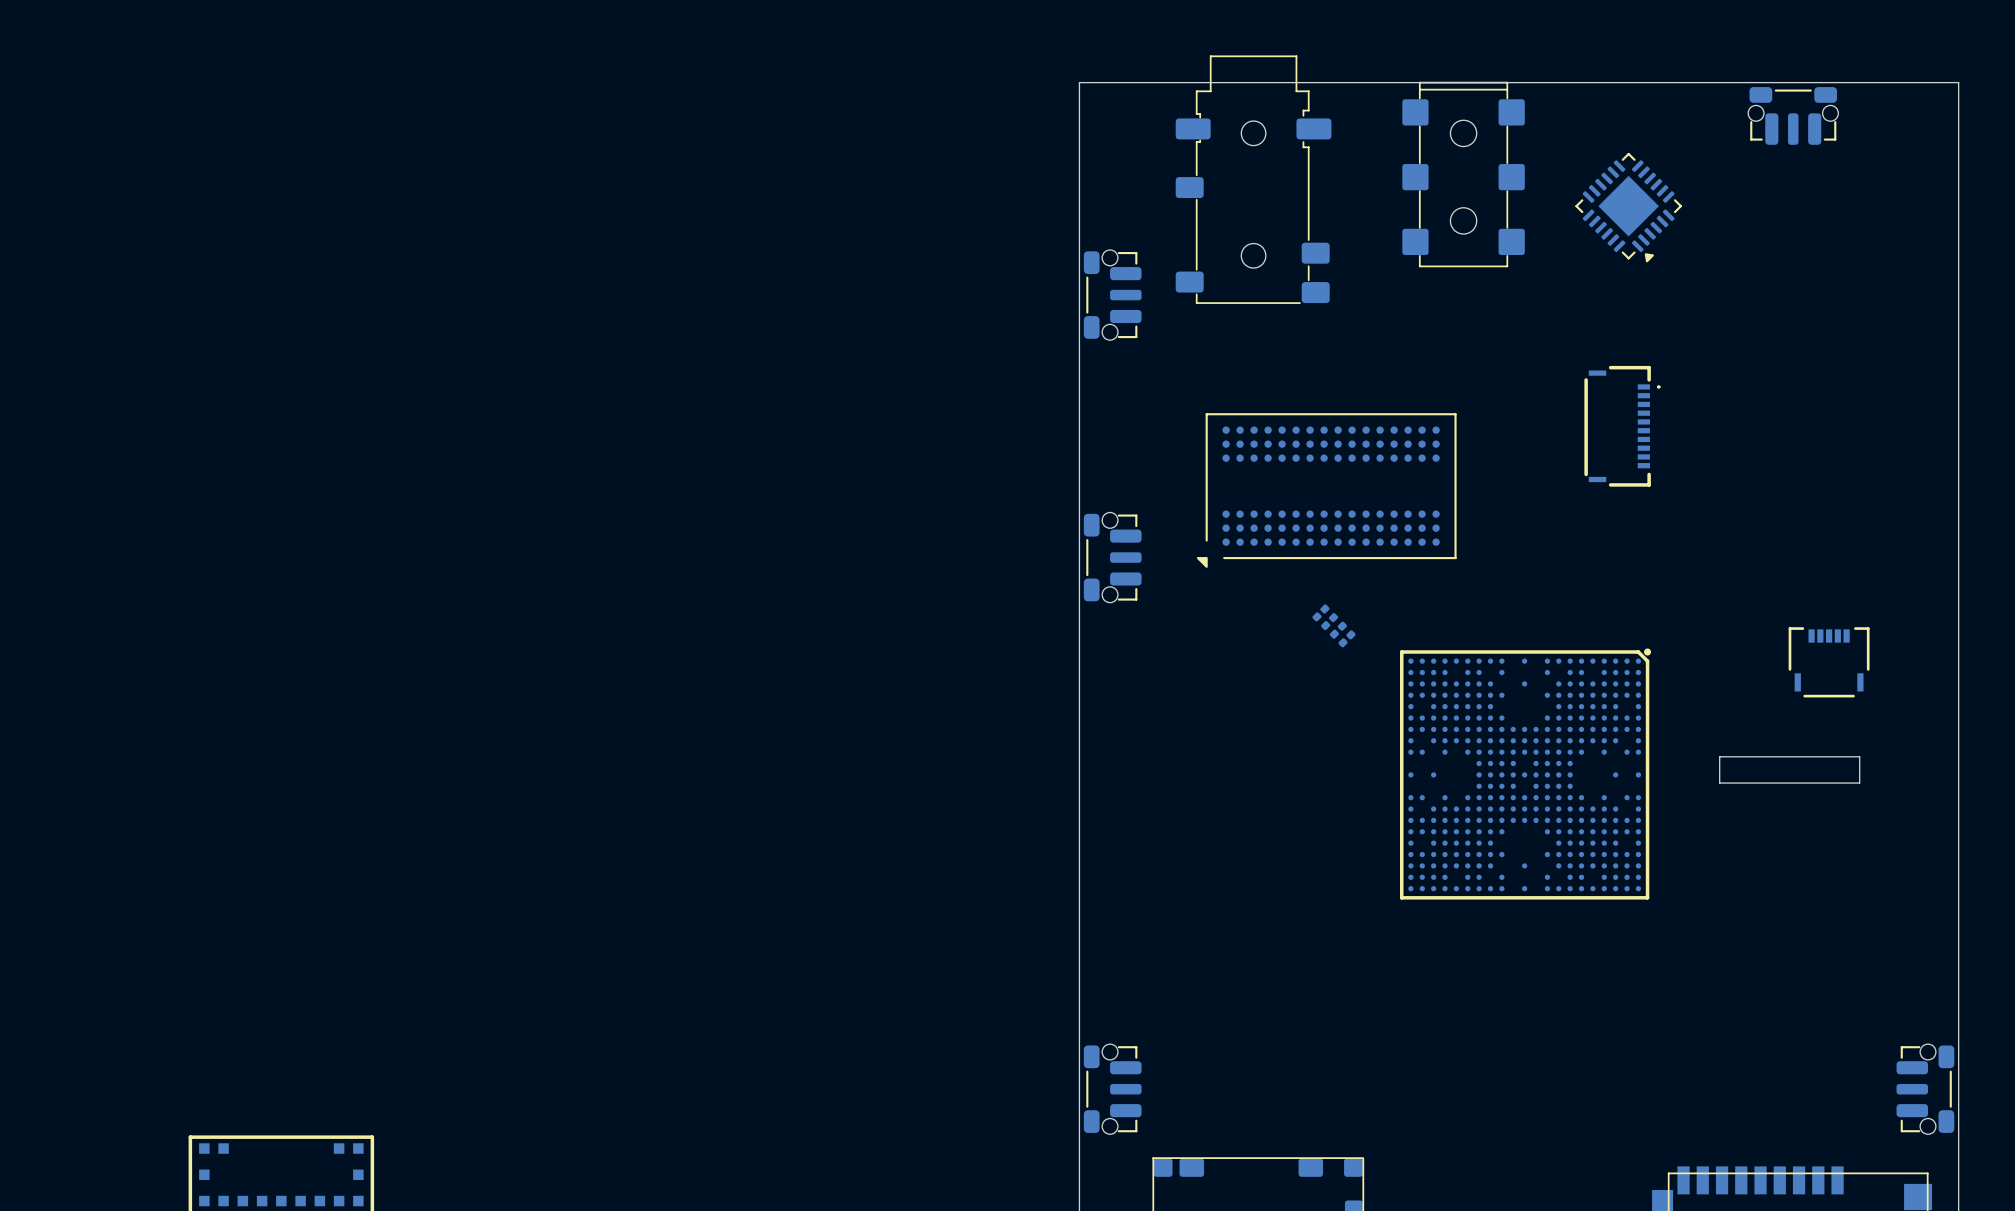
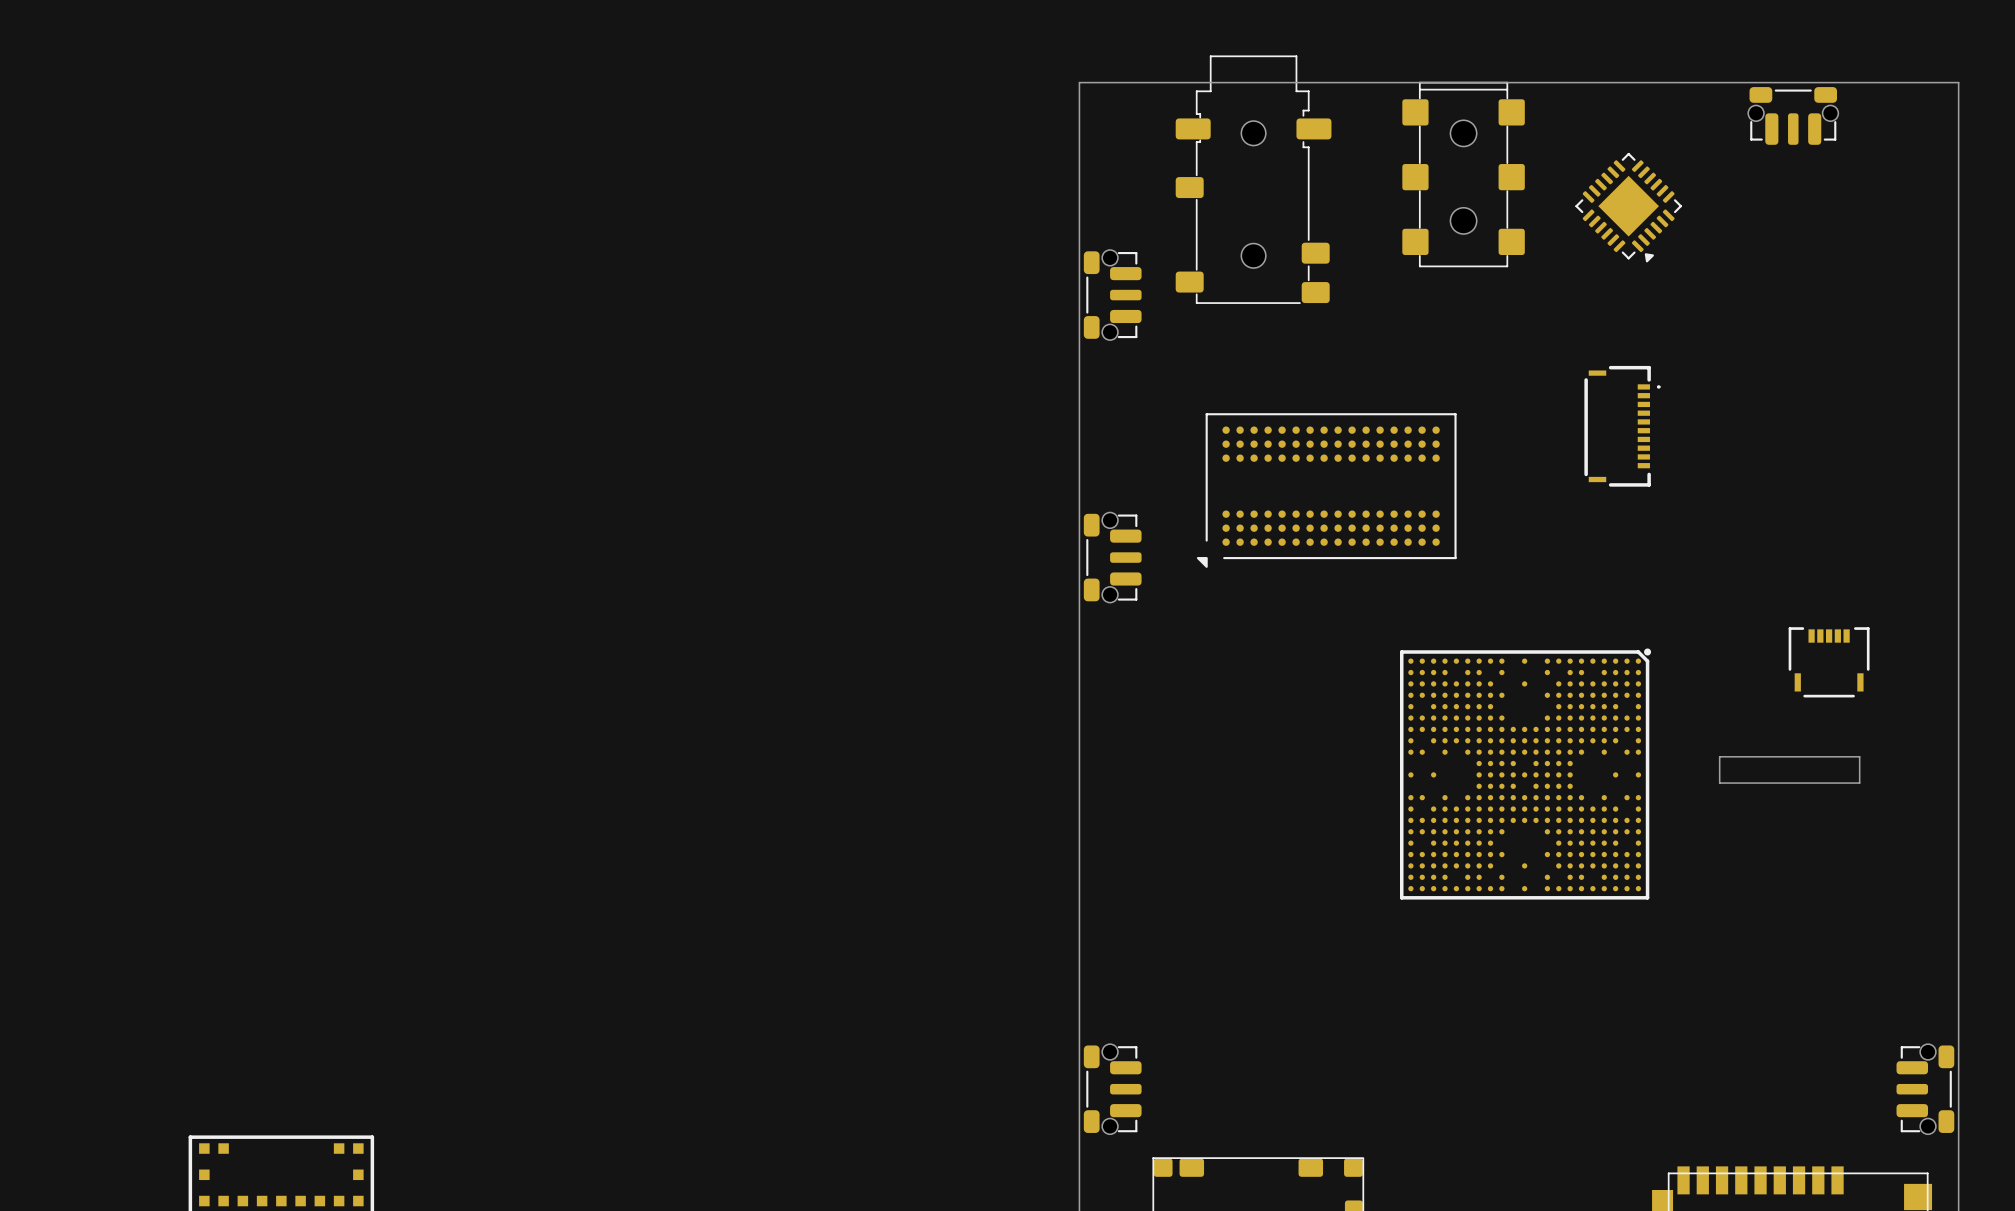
part: (1320, 612) -> none
part: (1329, 621) -> none
part: (1338, 630) -> none
part: (1347, 638) -> none

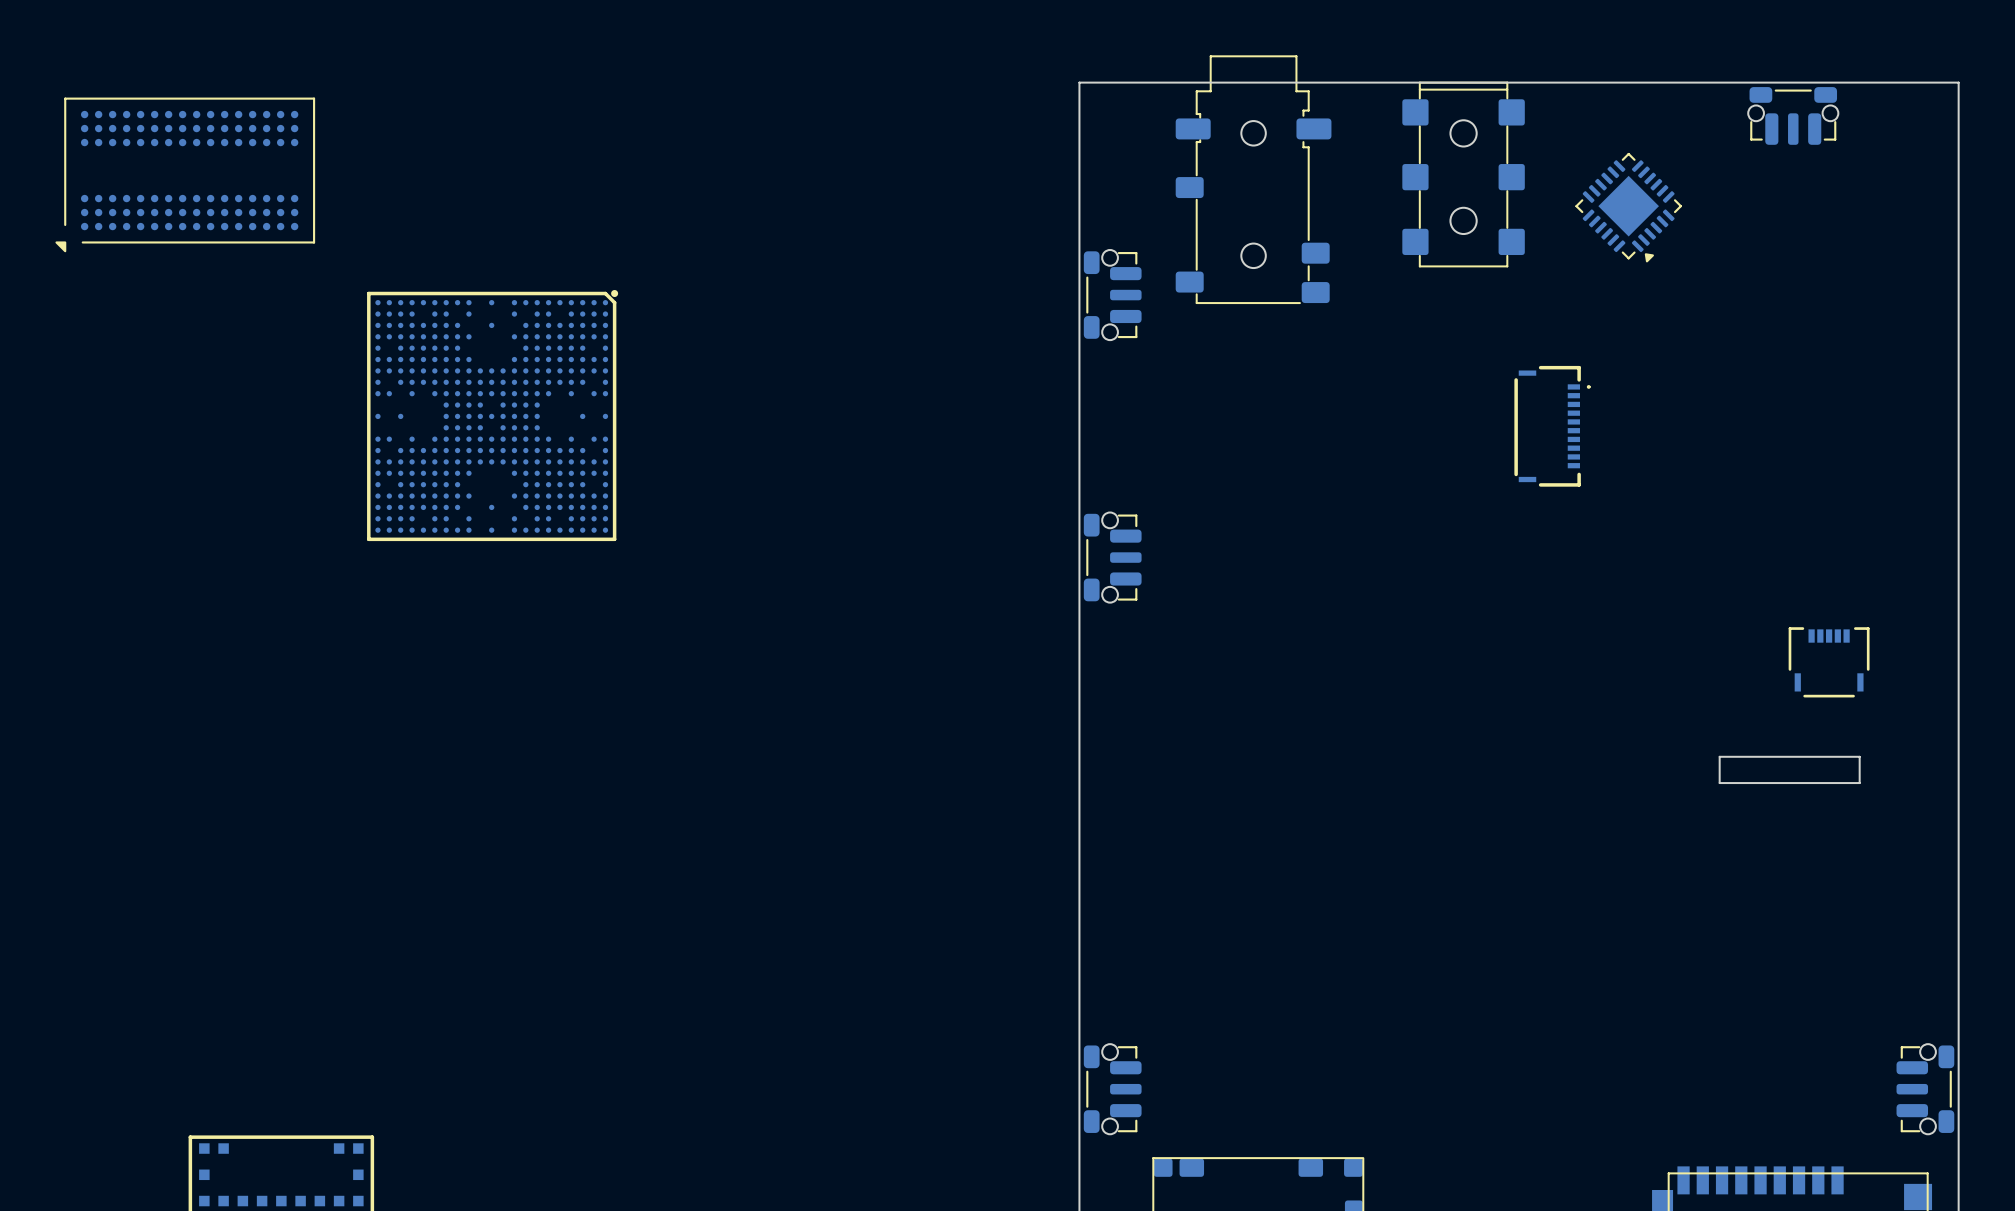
part: none -> (185, 174)
part: none -> (492, 415)
part position: (1622, 426) -> (1552, 426)
part: (1326, 490) -> none
part: (1525, 774) -> none

